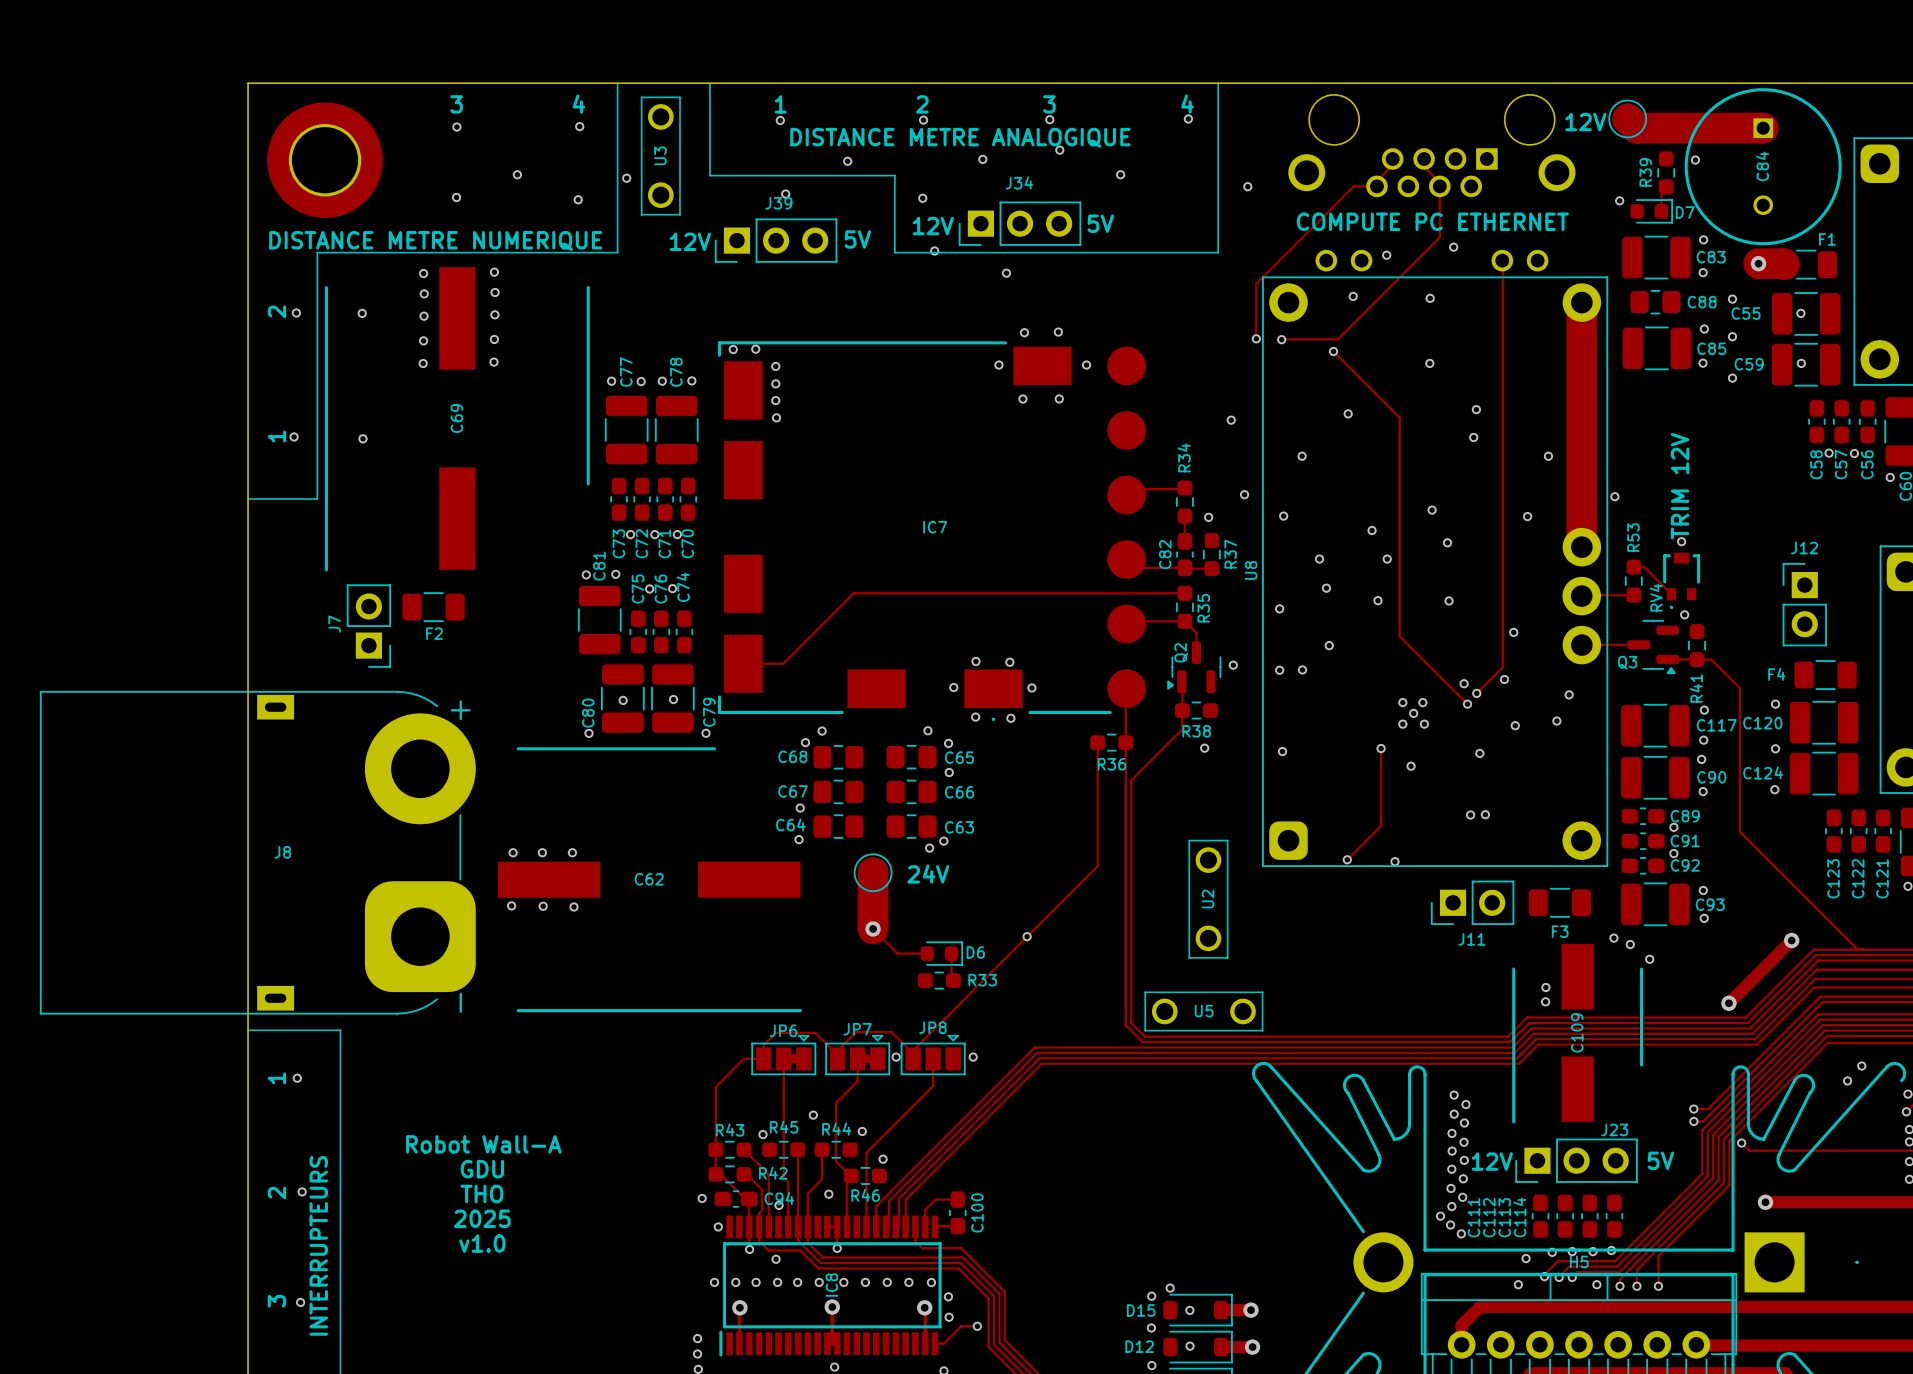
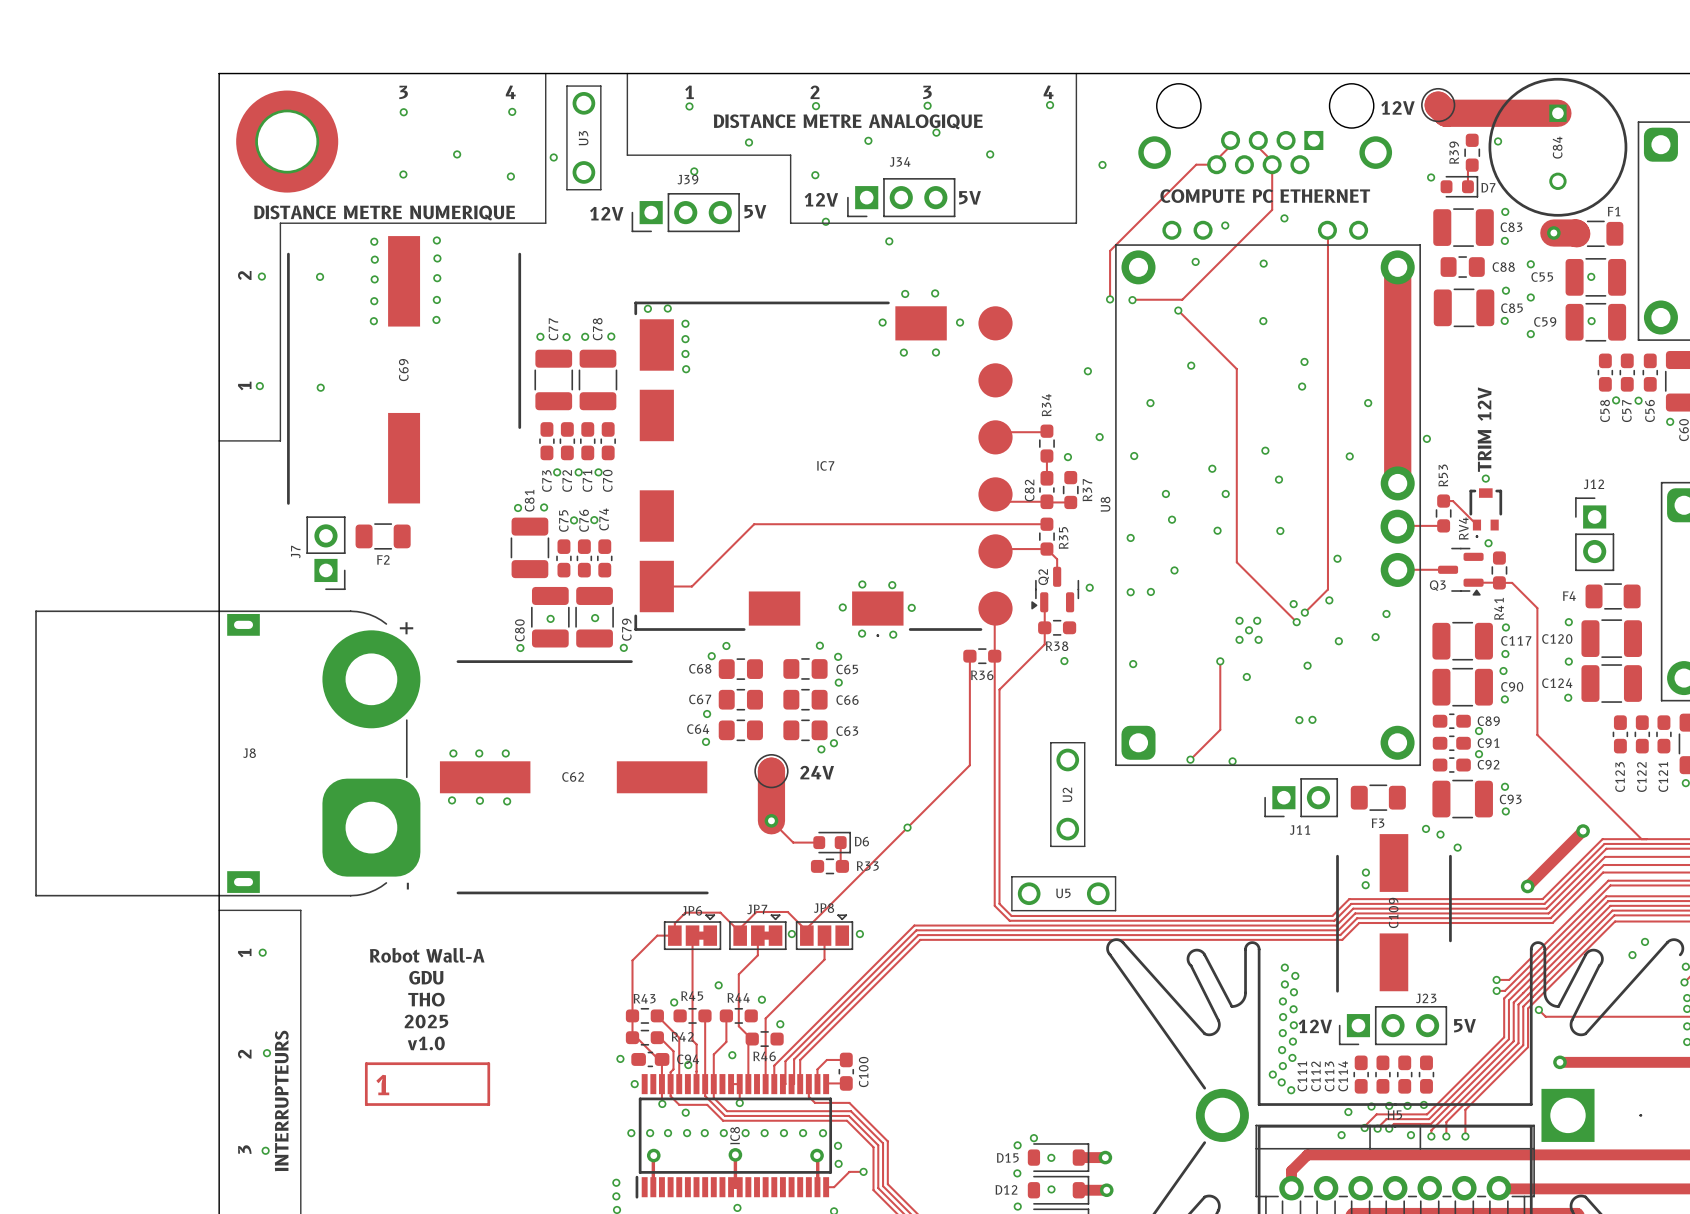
text position: Robot Wall-A (483, 1144) -> Robot Wall-A (427, 955)
text position: GDU (482, 1169) -> GDU (426, 977)
text position: THO (481, 1193) -> THO (426, 999)
track: none -> (366, 1063) (366, 1104) (488, 1104) (488, 1063) (366, 1063)
text position: 2025 (482, 1218) -> 2025 (426, 1021)
text: none -> 1 (382, 1085)
text position: v1.0 (482, 1243) -> v1.0 (426, 1043)

